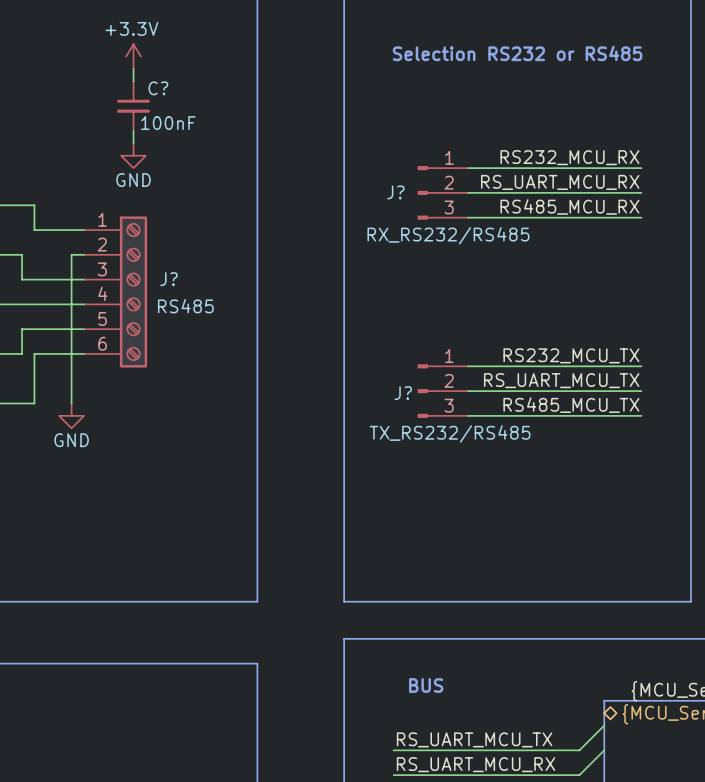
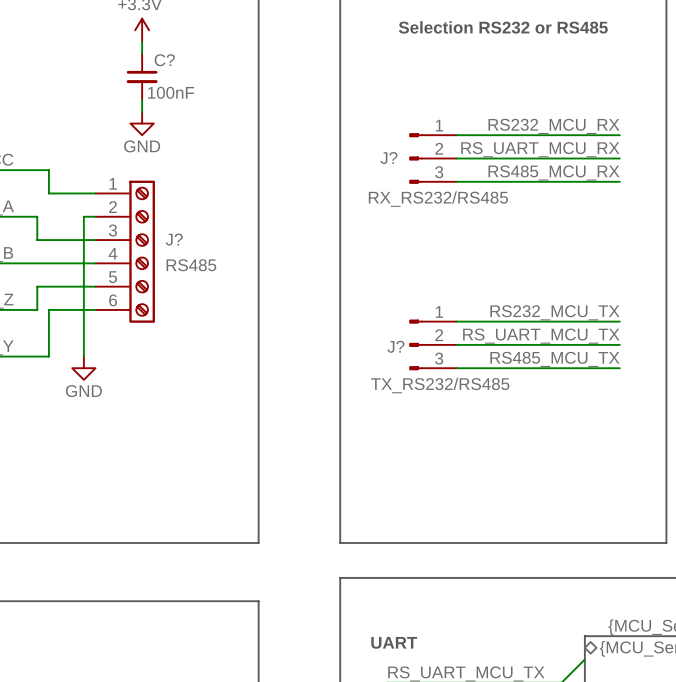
text: BUS (426, 685) -> none
text: none -> UART (394, 642)

